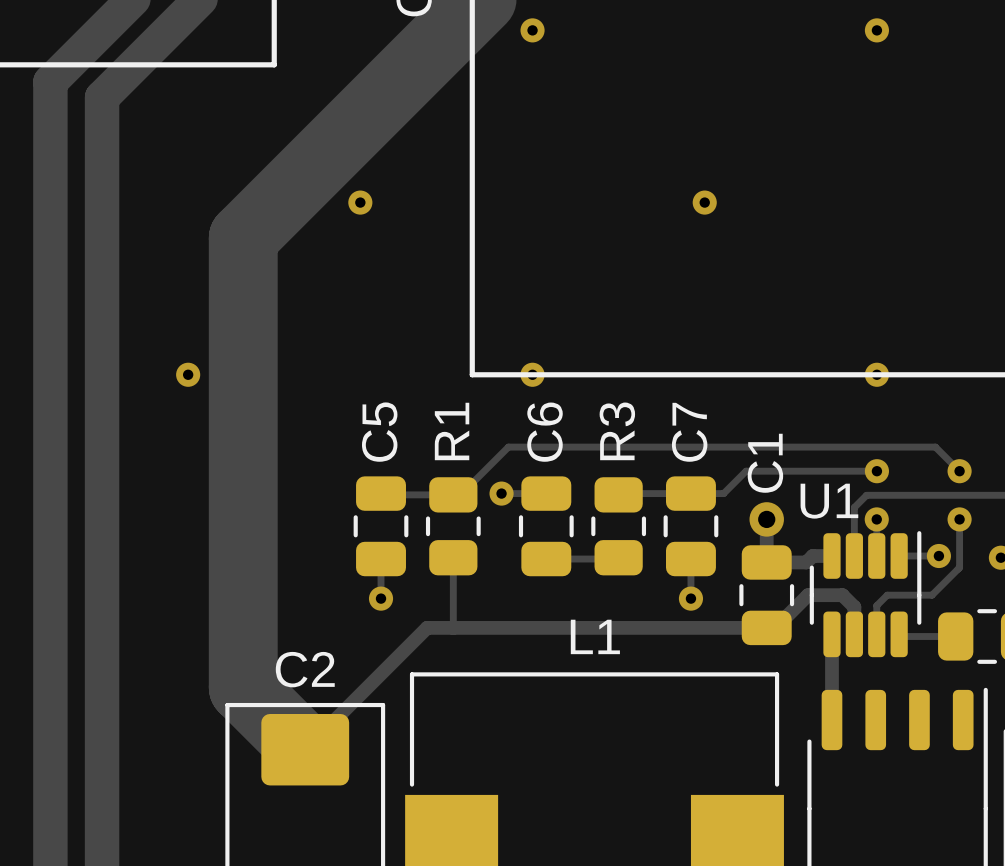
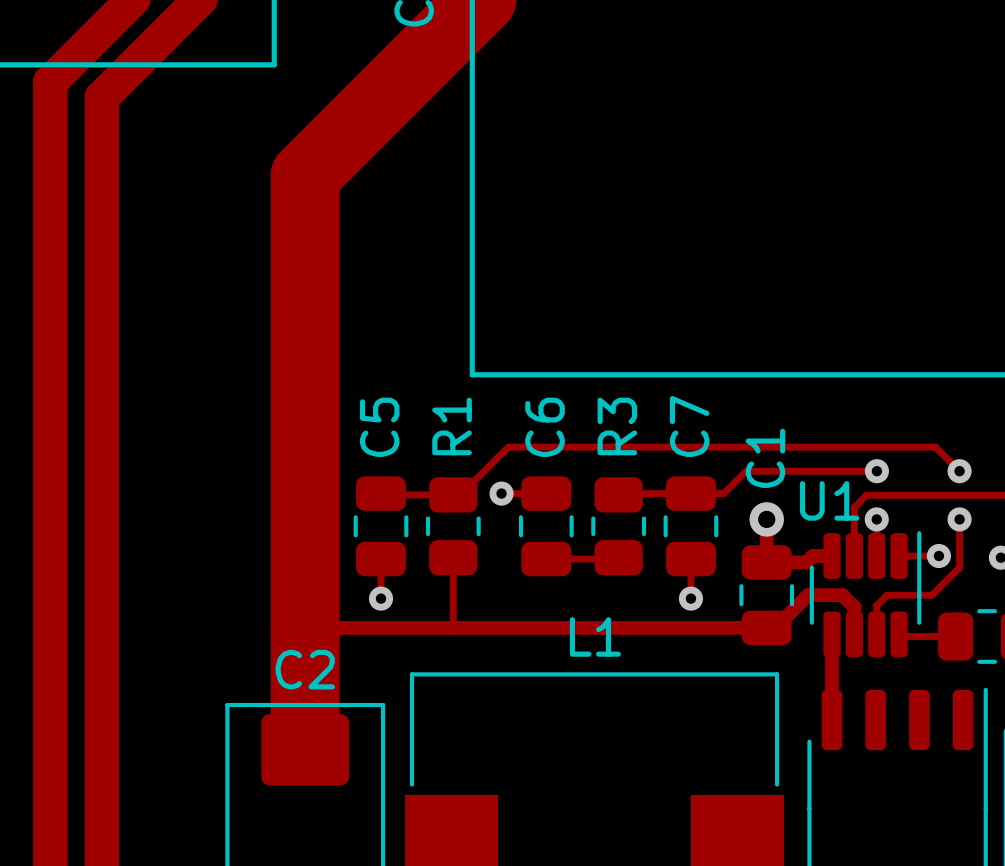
via: (532, 30) -> none
via: (876, 30) -> none
track: (305, 175) (243, 237) (243, 687) (305, 749) (427, 627) -> (305, 175) (305, 749)
via: (360, 202) -> none
via: (704, 202) -> none
via: (188, 374) -> none
via: (532, 374) -> none
via: (876, 374) -> none
track: none -> (427, 627) (306, 627) (305, 629)

